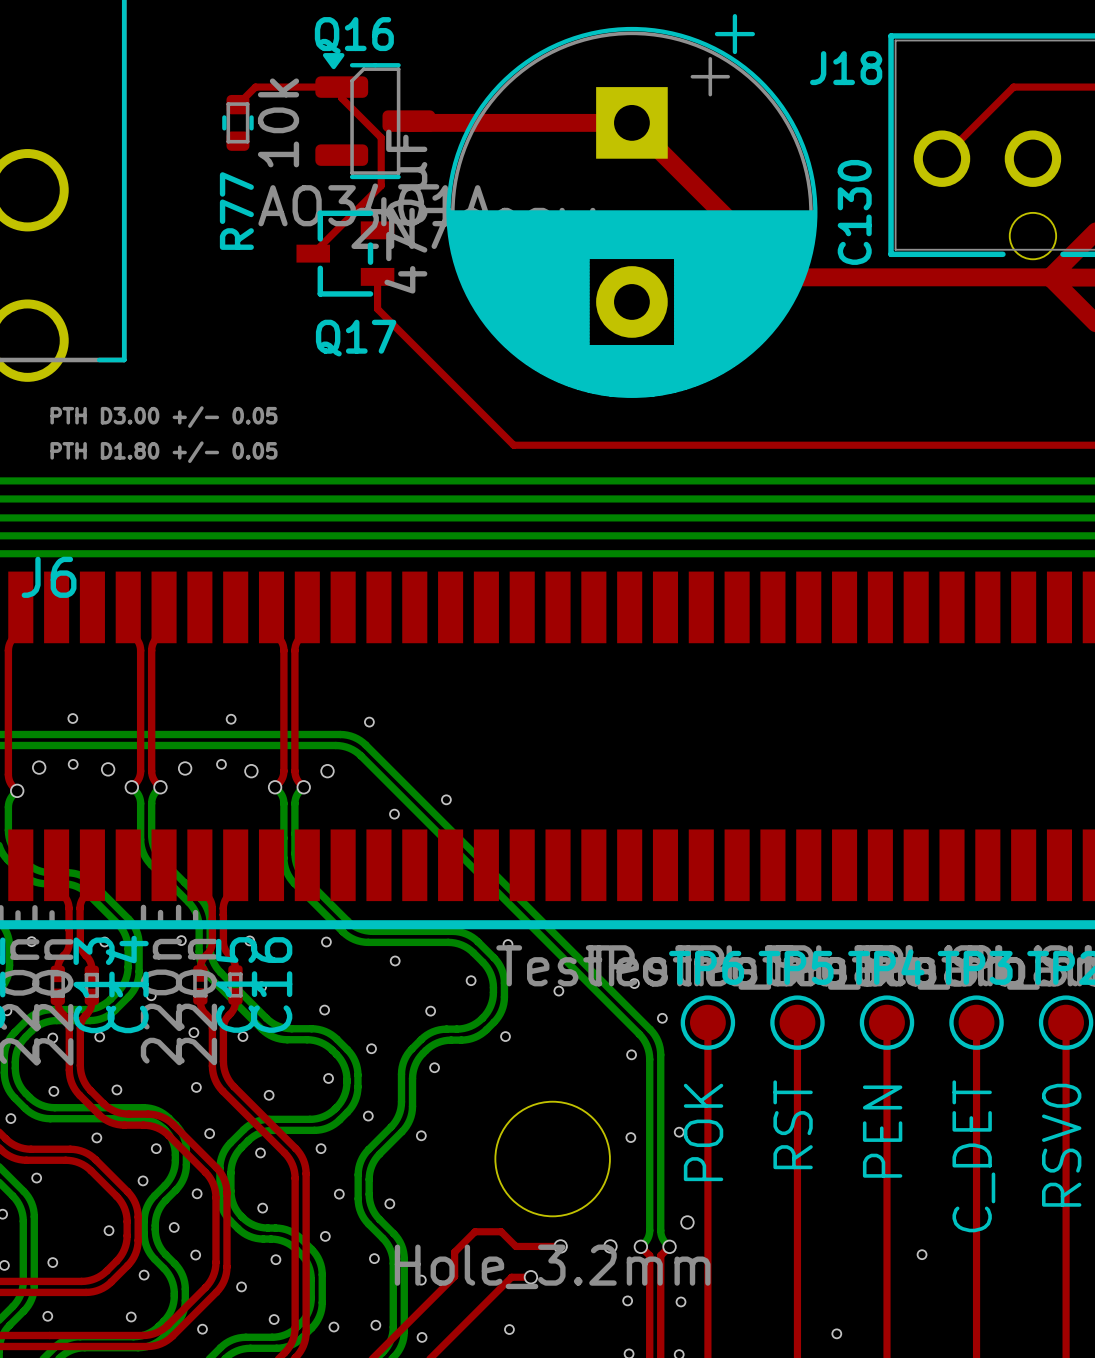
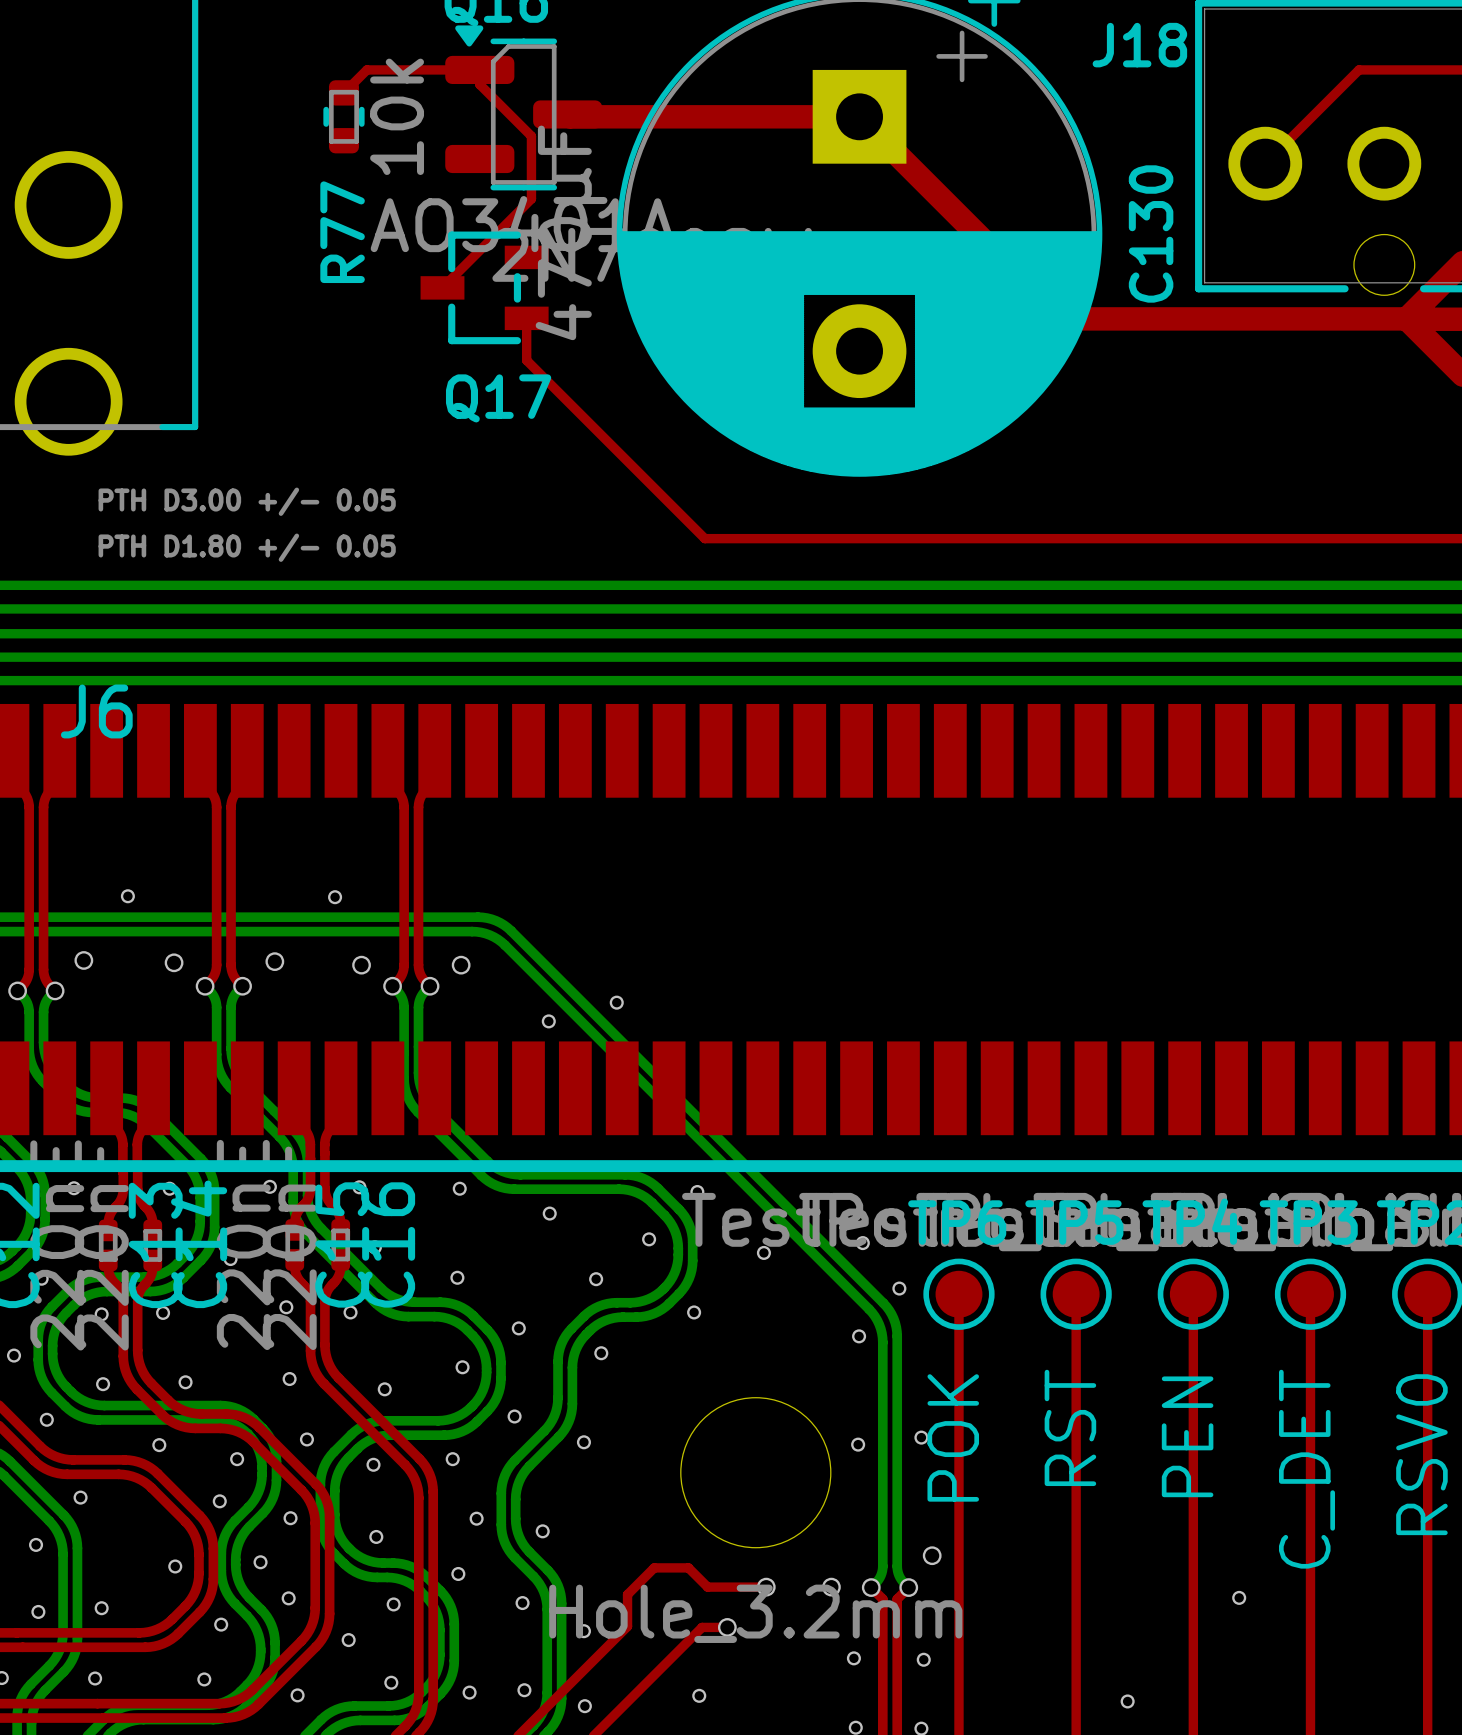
via: (369, 722) -> none
via: (73, 764) -> none
via: (221, 764) -> none

